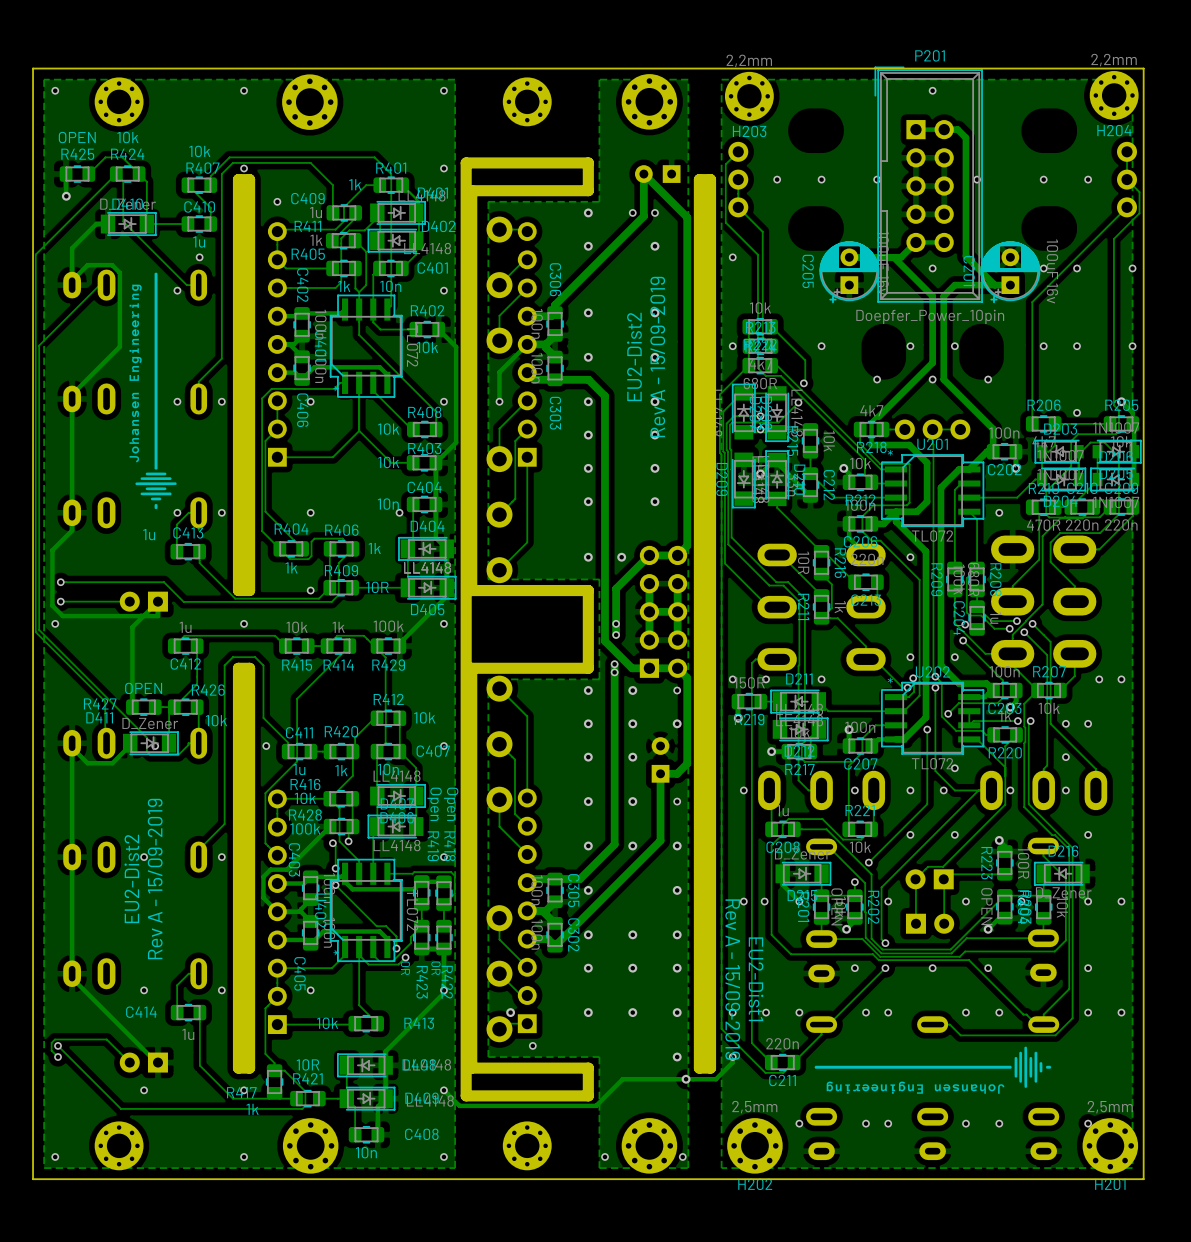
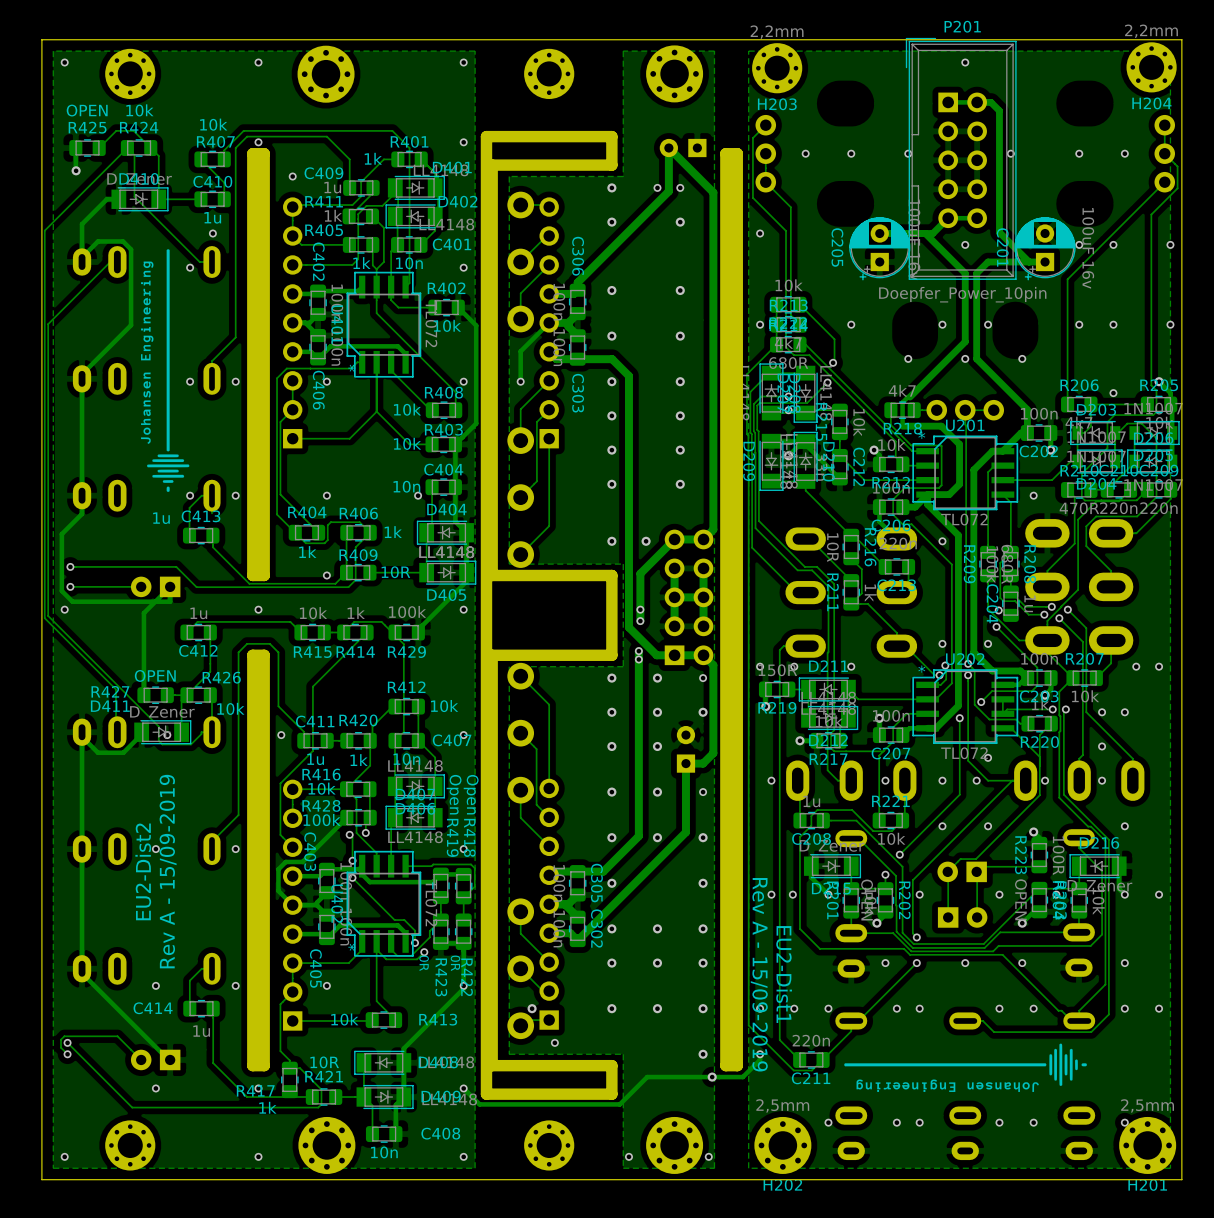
text: EU2-Dist2 (634, 356) -> none
text: Rev A - 15/09-2019 (657, 357) -> none

